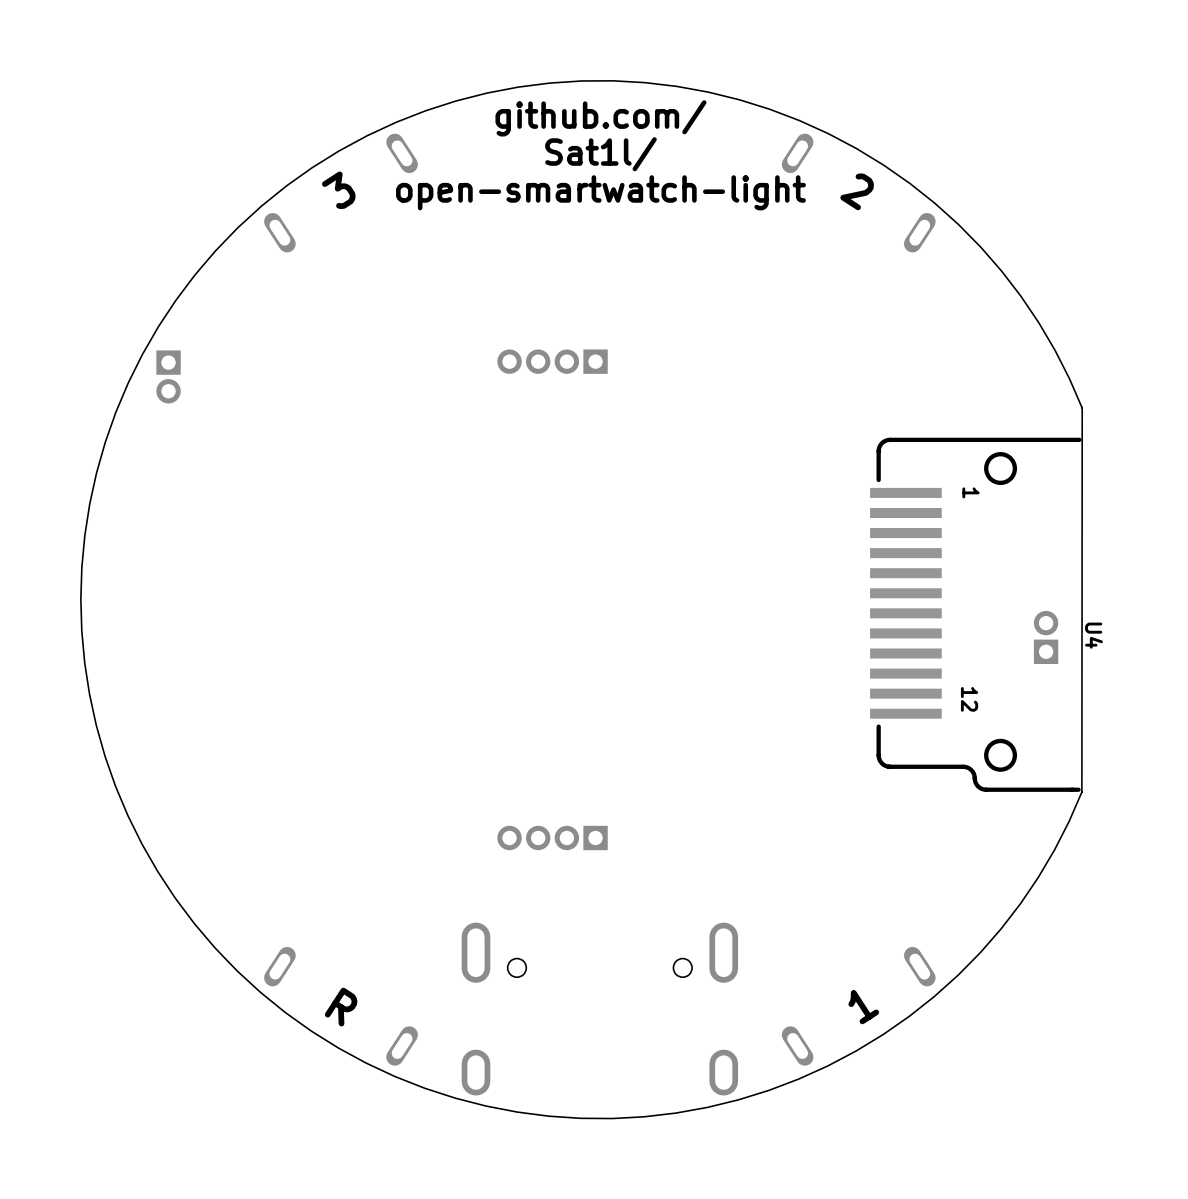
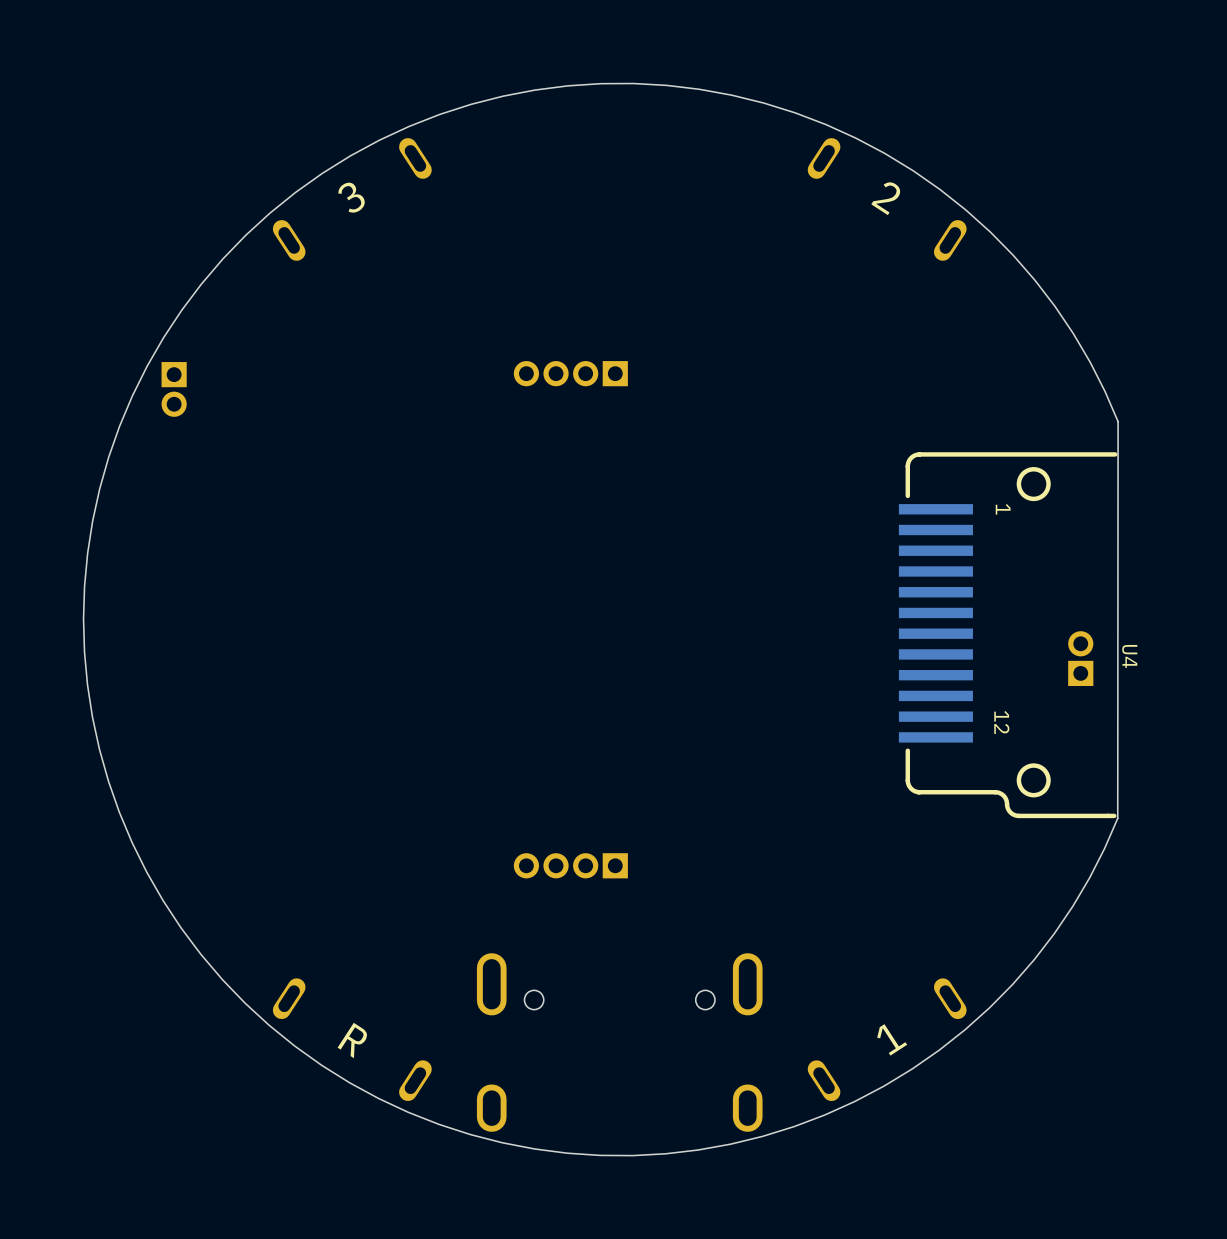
text: github.com/ (600, 118) -> none
text: Sat1l/ (600, 154) -> none
text: open-smartwatch-light (600, 192) -> none

